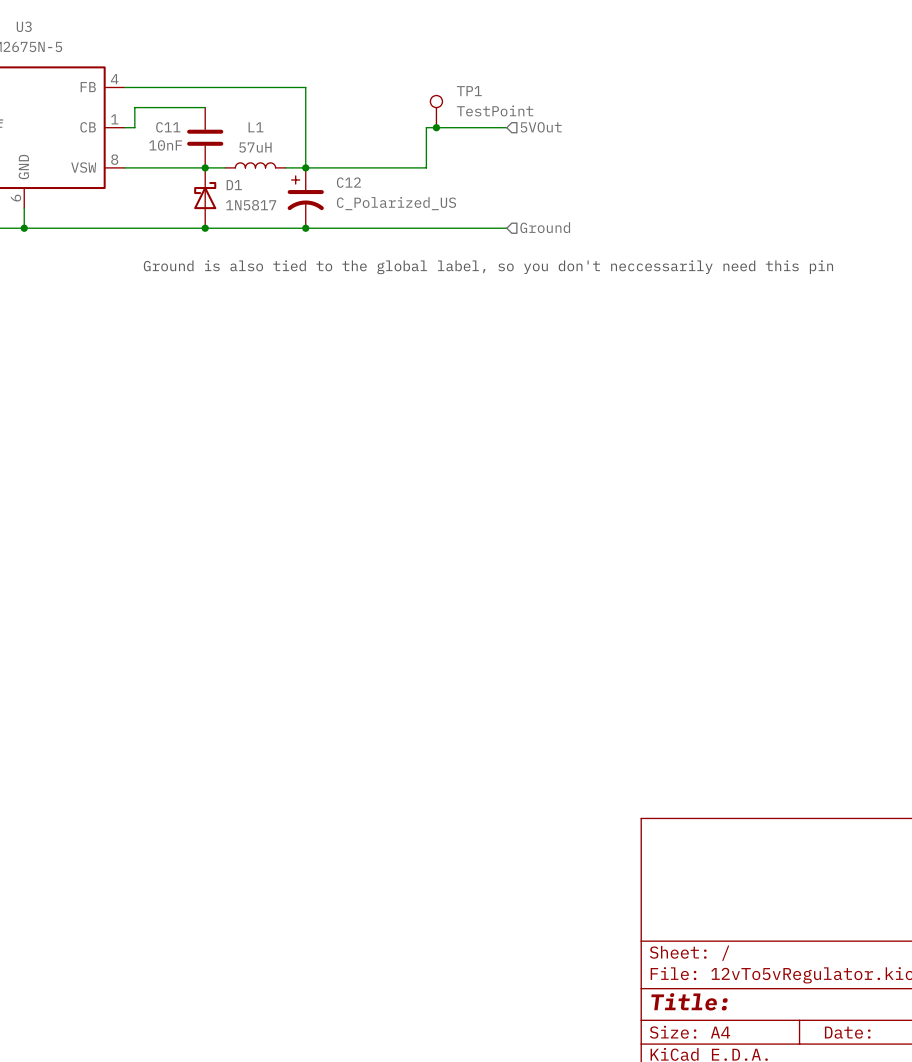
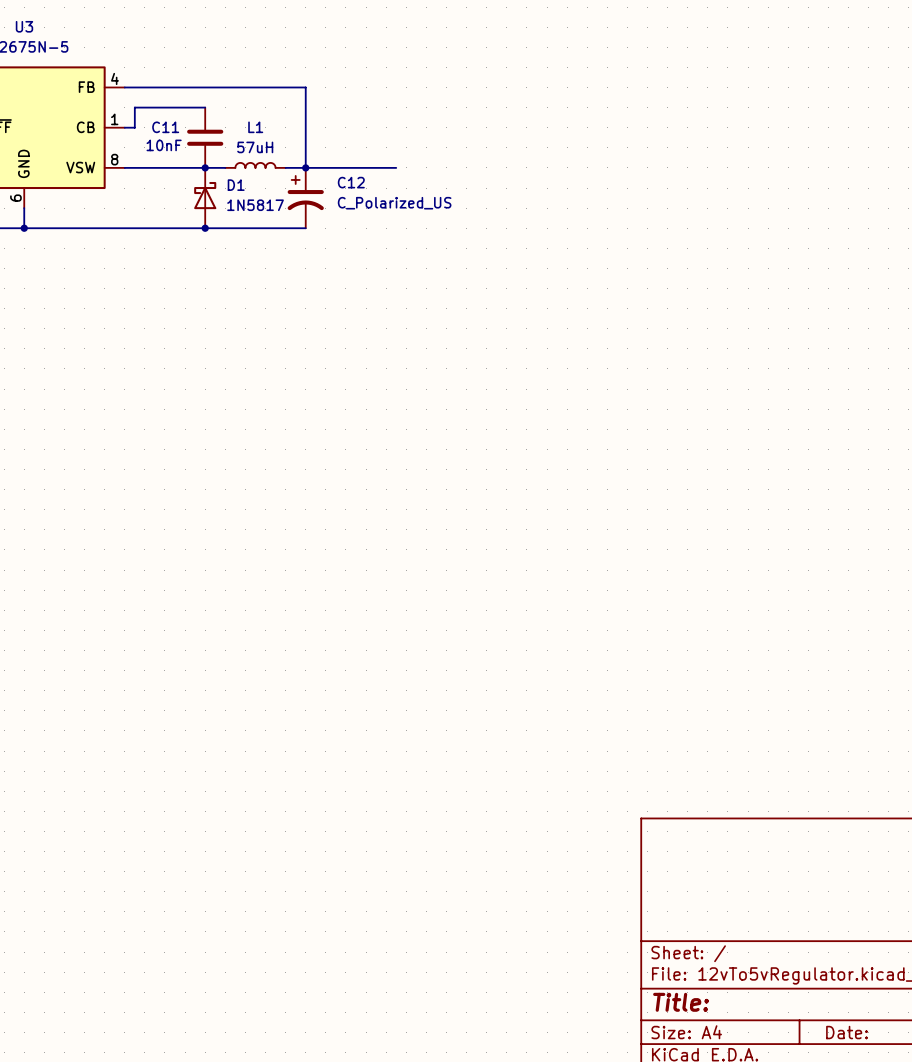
TP1: TestPoint (436, 111) -> none
junction: (436, 127) -> none
wire: (506, 127) (426, 127) (426, 167) (396, 167) -> none
hierarchical label: 5VOut (541, 127) -> none
hierarchical label: Ground (545, 227) -> none
wire: (305, 228) (506, 228) -> none
junction: (305, 228) -> none
text: Ground is also tied to the global label, so you don't neccessarily need this pin (488, 267) -> none

